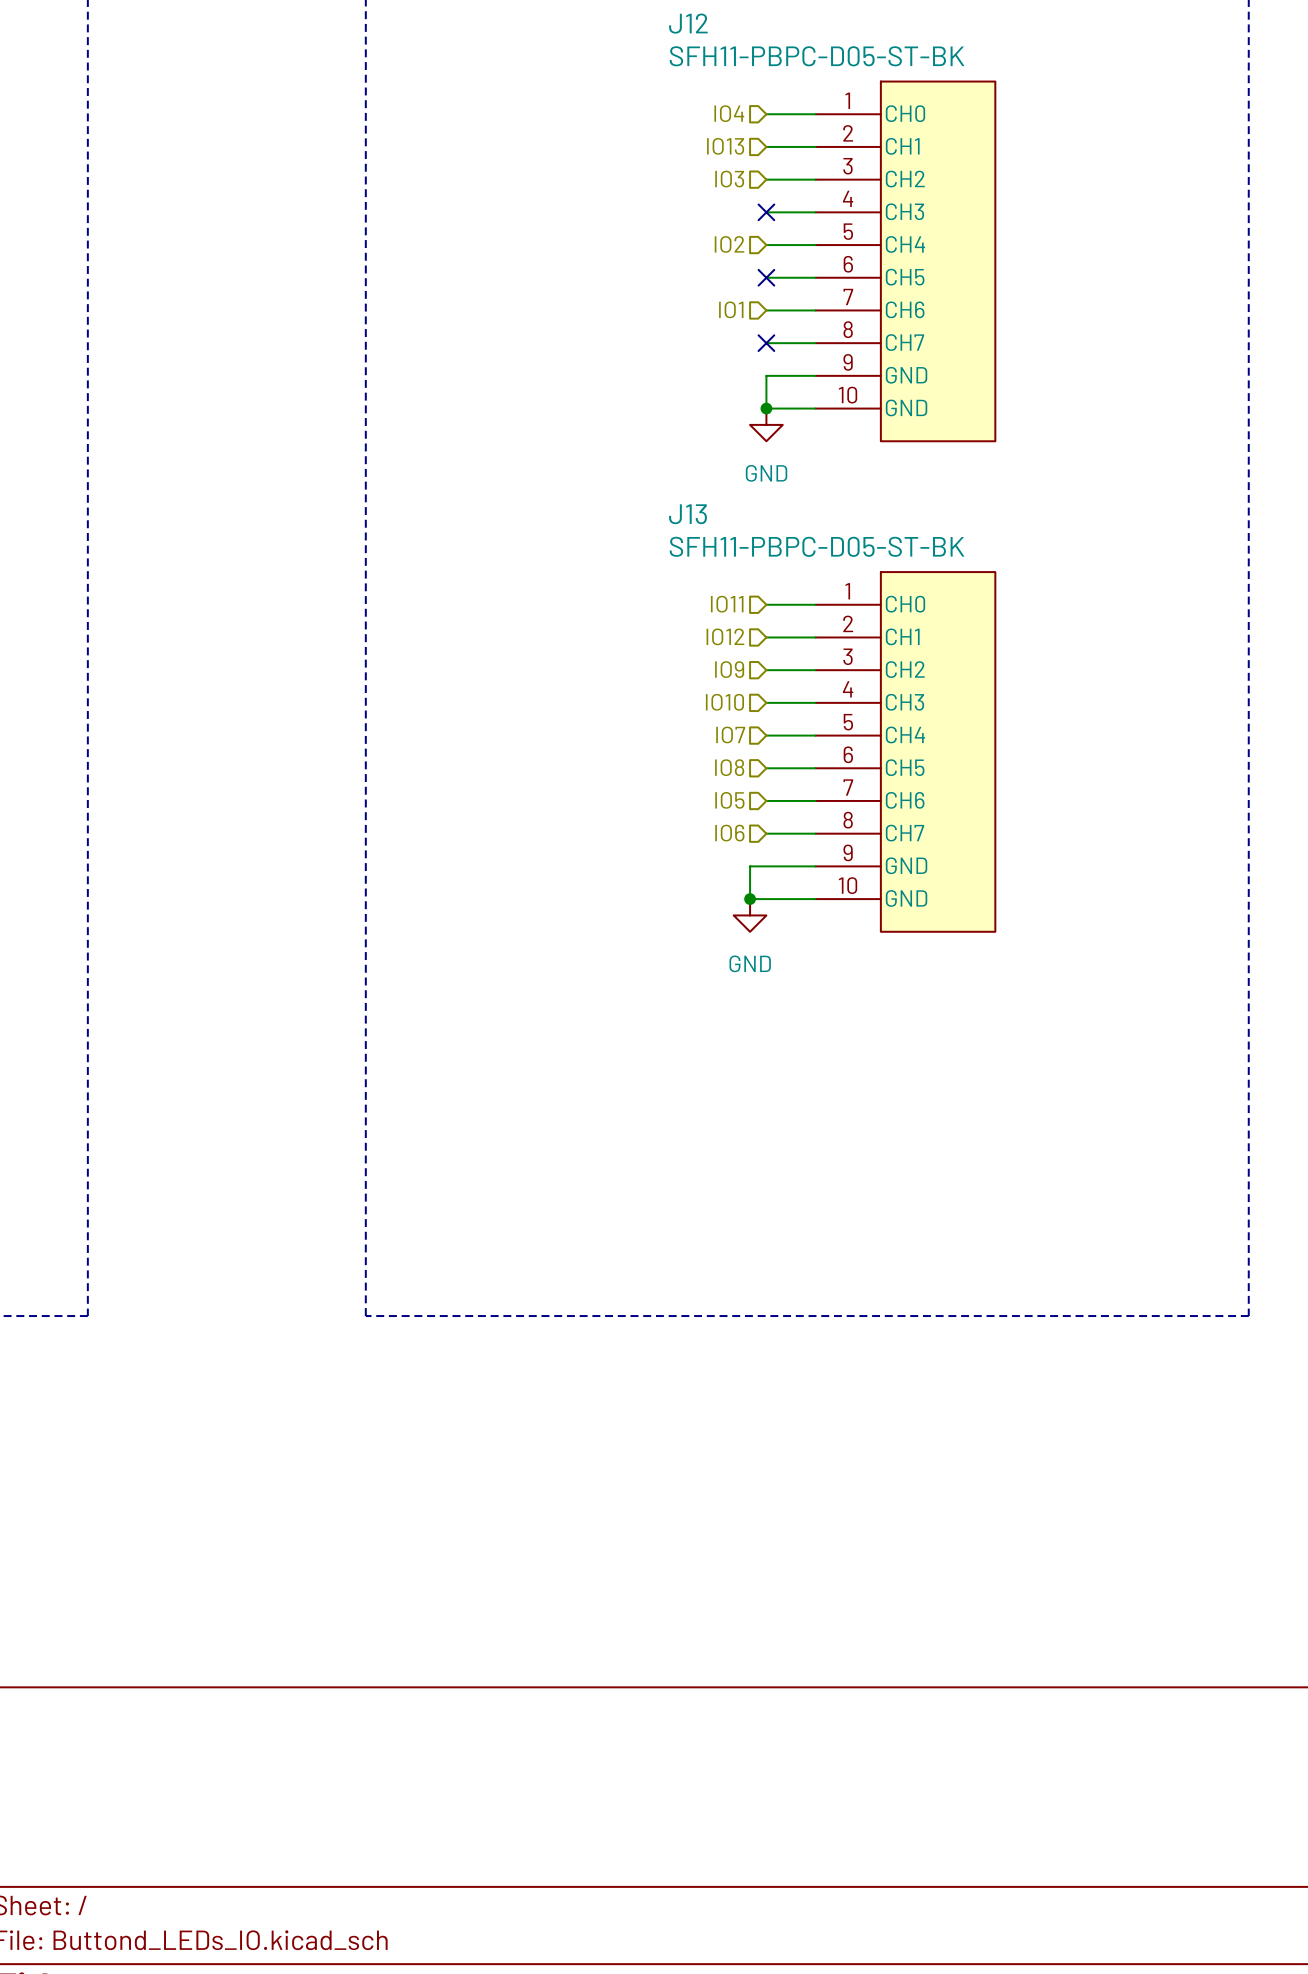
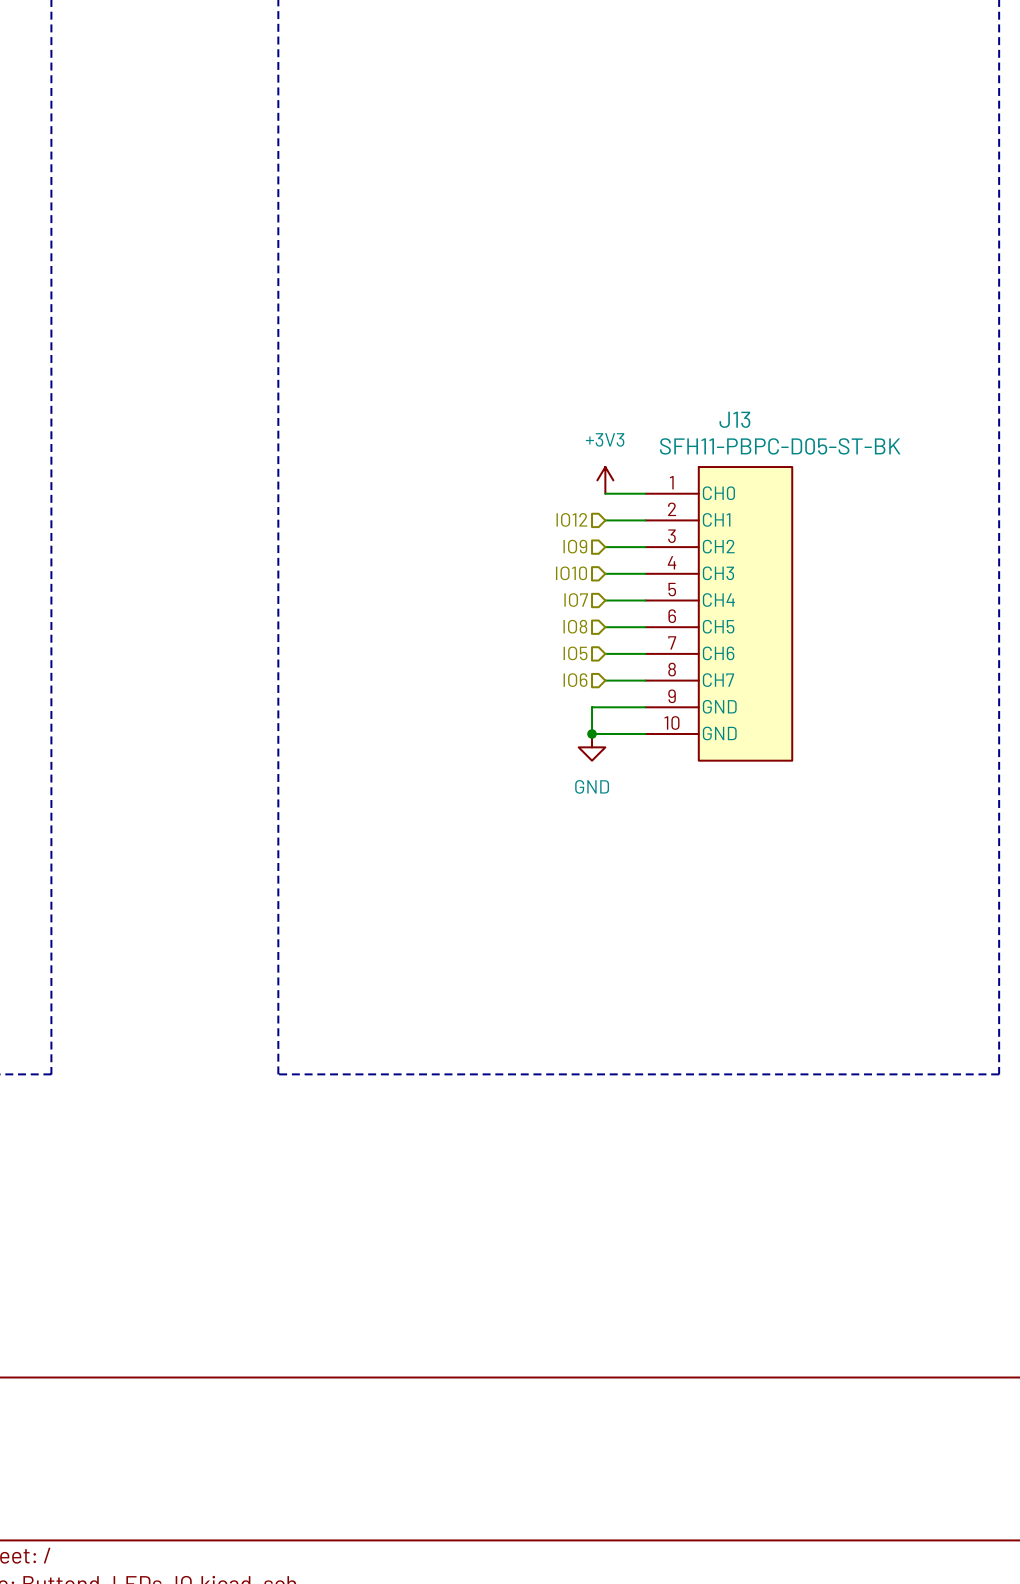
hierarchical label: IO4 (729, 113) -> none
wire: (766, 114) (815, 114) -> none
hierarchical label: IO13 (725, 146) -> none
wire: (766, 146) (815, 146) -> none
hierarchical label: IO3 (729, 179) -> none
wire: (766, 179) (815, 179) -> none
wire: (766, 212) (815, 212) -> none
no-connect mark: (766, 212) -> none
hierarchical label: IO2 (729, 244) -> none
wire: (766, 245) (815, 245) -> none
J12: SFH11-PBPC-D05-ST-BK (905, 261) -> none
wire: (766, 277) (815, 277) -> none
no-connect mark: (766, 277) -> none
hierarchical label: IO1 (731, 309) -> none
wire: (766, 310) (815, 310) -> none
wire: (766, 343) (815, 343) -> none
no-connect mark: (766, 343) -> none
wire: (815, 375) (766, 375) (766, 408) (815, 408) -> none
junction: (766, 408) -> none
power symbol: GND (766, 424) -> none
J13 name position: J13 (688, 514) -> J13 (734, 419)
J13 value position: SFH11-PBPC-D05-ST-BK (817, 546) -> SFH11-PBPC-D05-ST-BK (780, 446)
power symbol: none -> +3V3 (605, 480)
hierarchical label: IO11 (727, 604) -> none

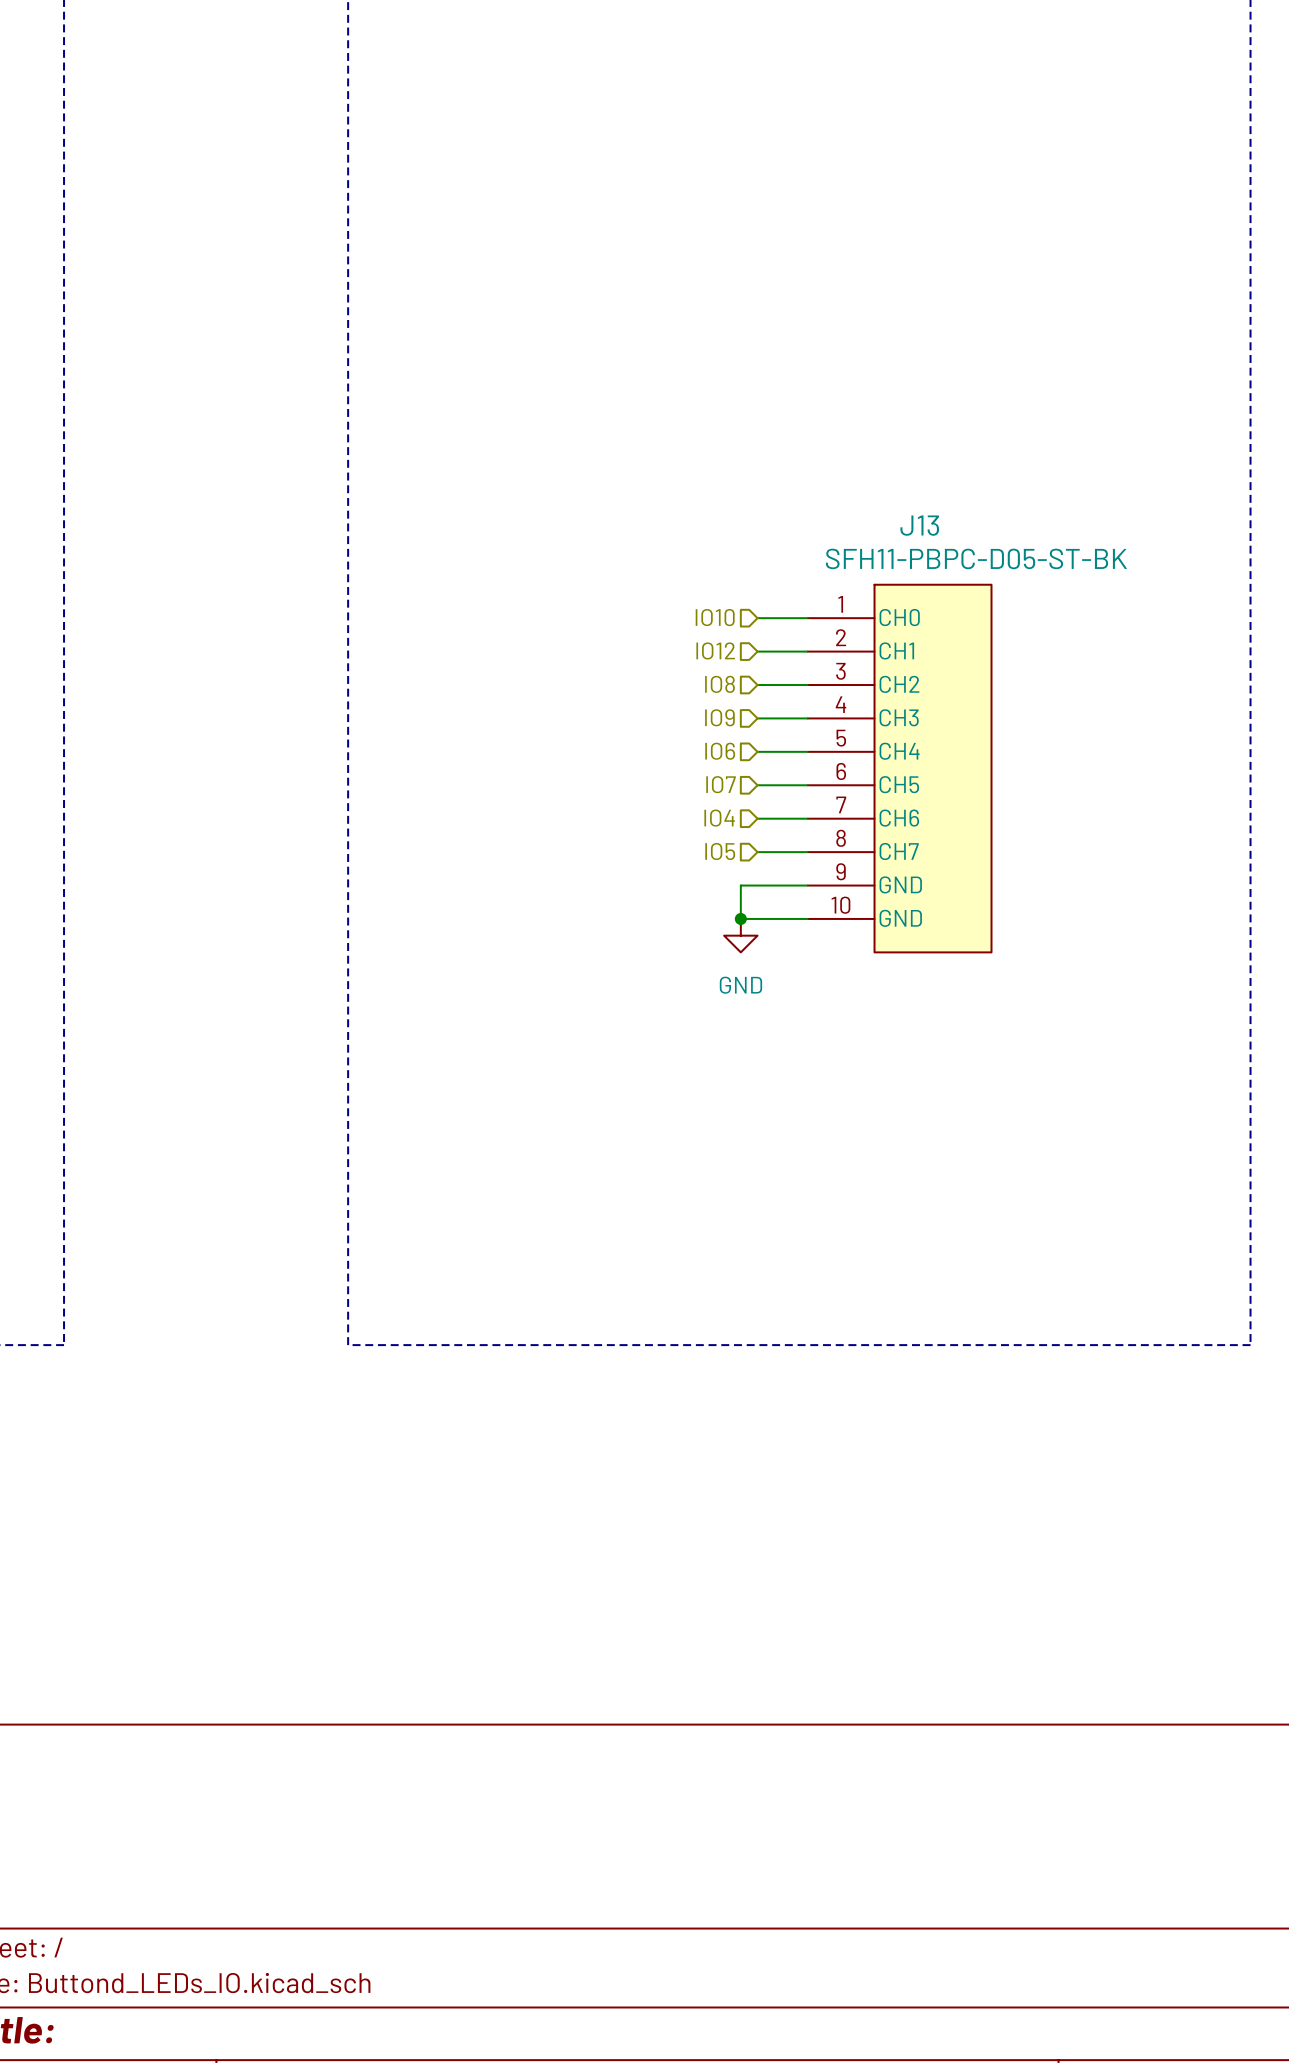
power symbol: +3V3 (605, 480) -> none
hierarchical label: none -> IO10 (715, 617)
hierarchical label: IO9 (575, 546) -> IO8 (719, 684)
hierarchical label: IO10 (571, 573) -> IO9 (719, 717)
hierarchical label: IO7 (576, 600) -> IO6 (720, 751)
hierarchical label: IO8 (575, 626) -> IO7 (721, 784)
hierarchical label: IO5 (575, 653) -> IO4 (719, 818)
hierarchical label: IO6 (575, 680) -> IO5 (720, 851)

